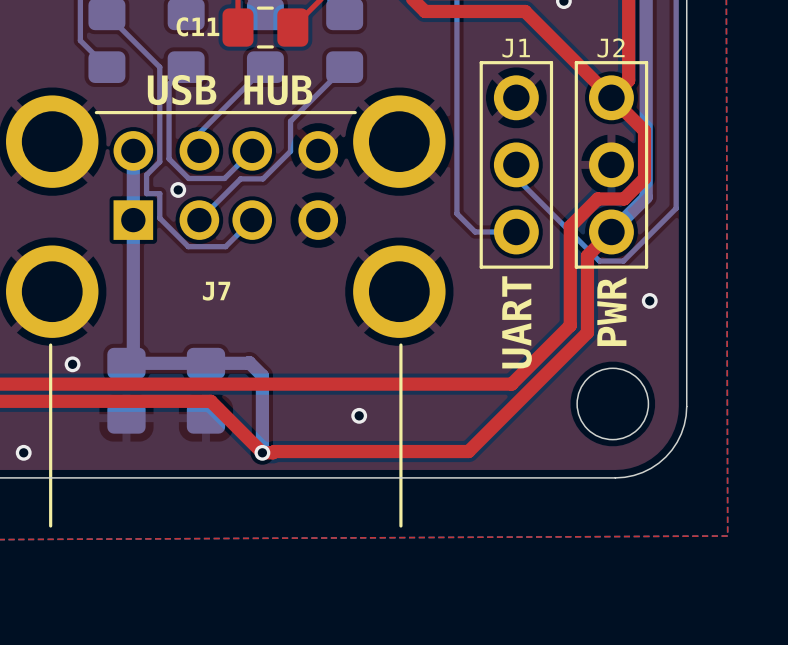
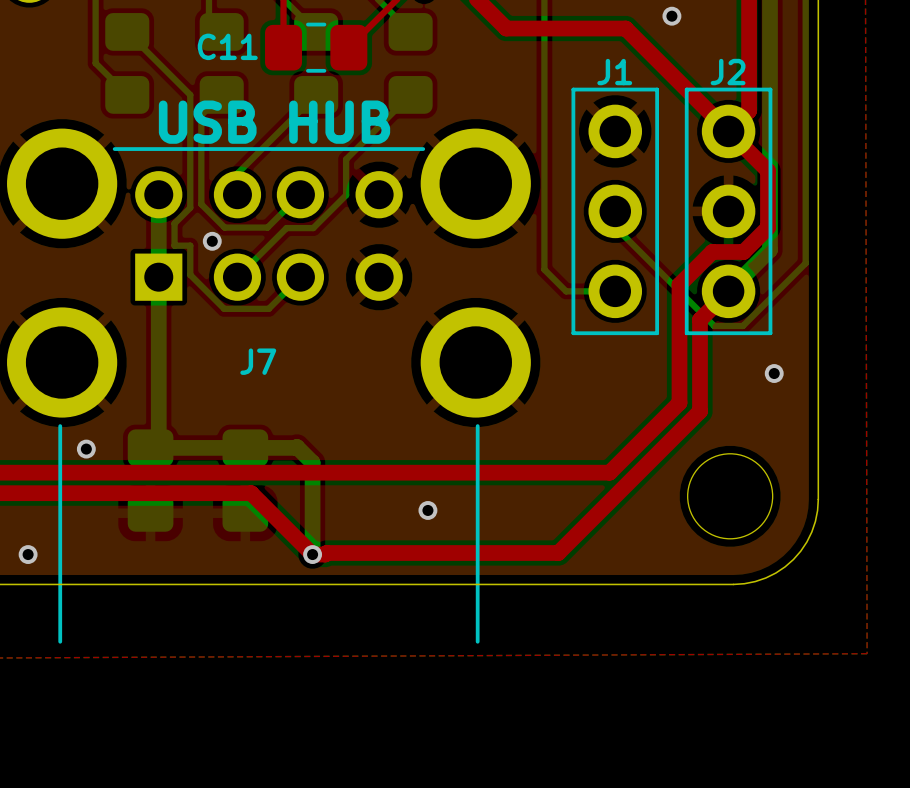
text: PWR (611, 311) -> none
text: UART (517, 322) -> none

